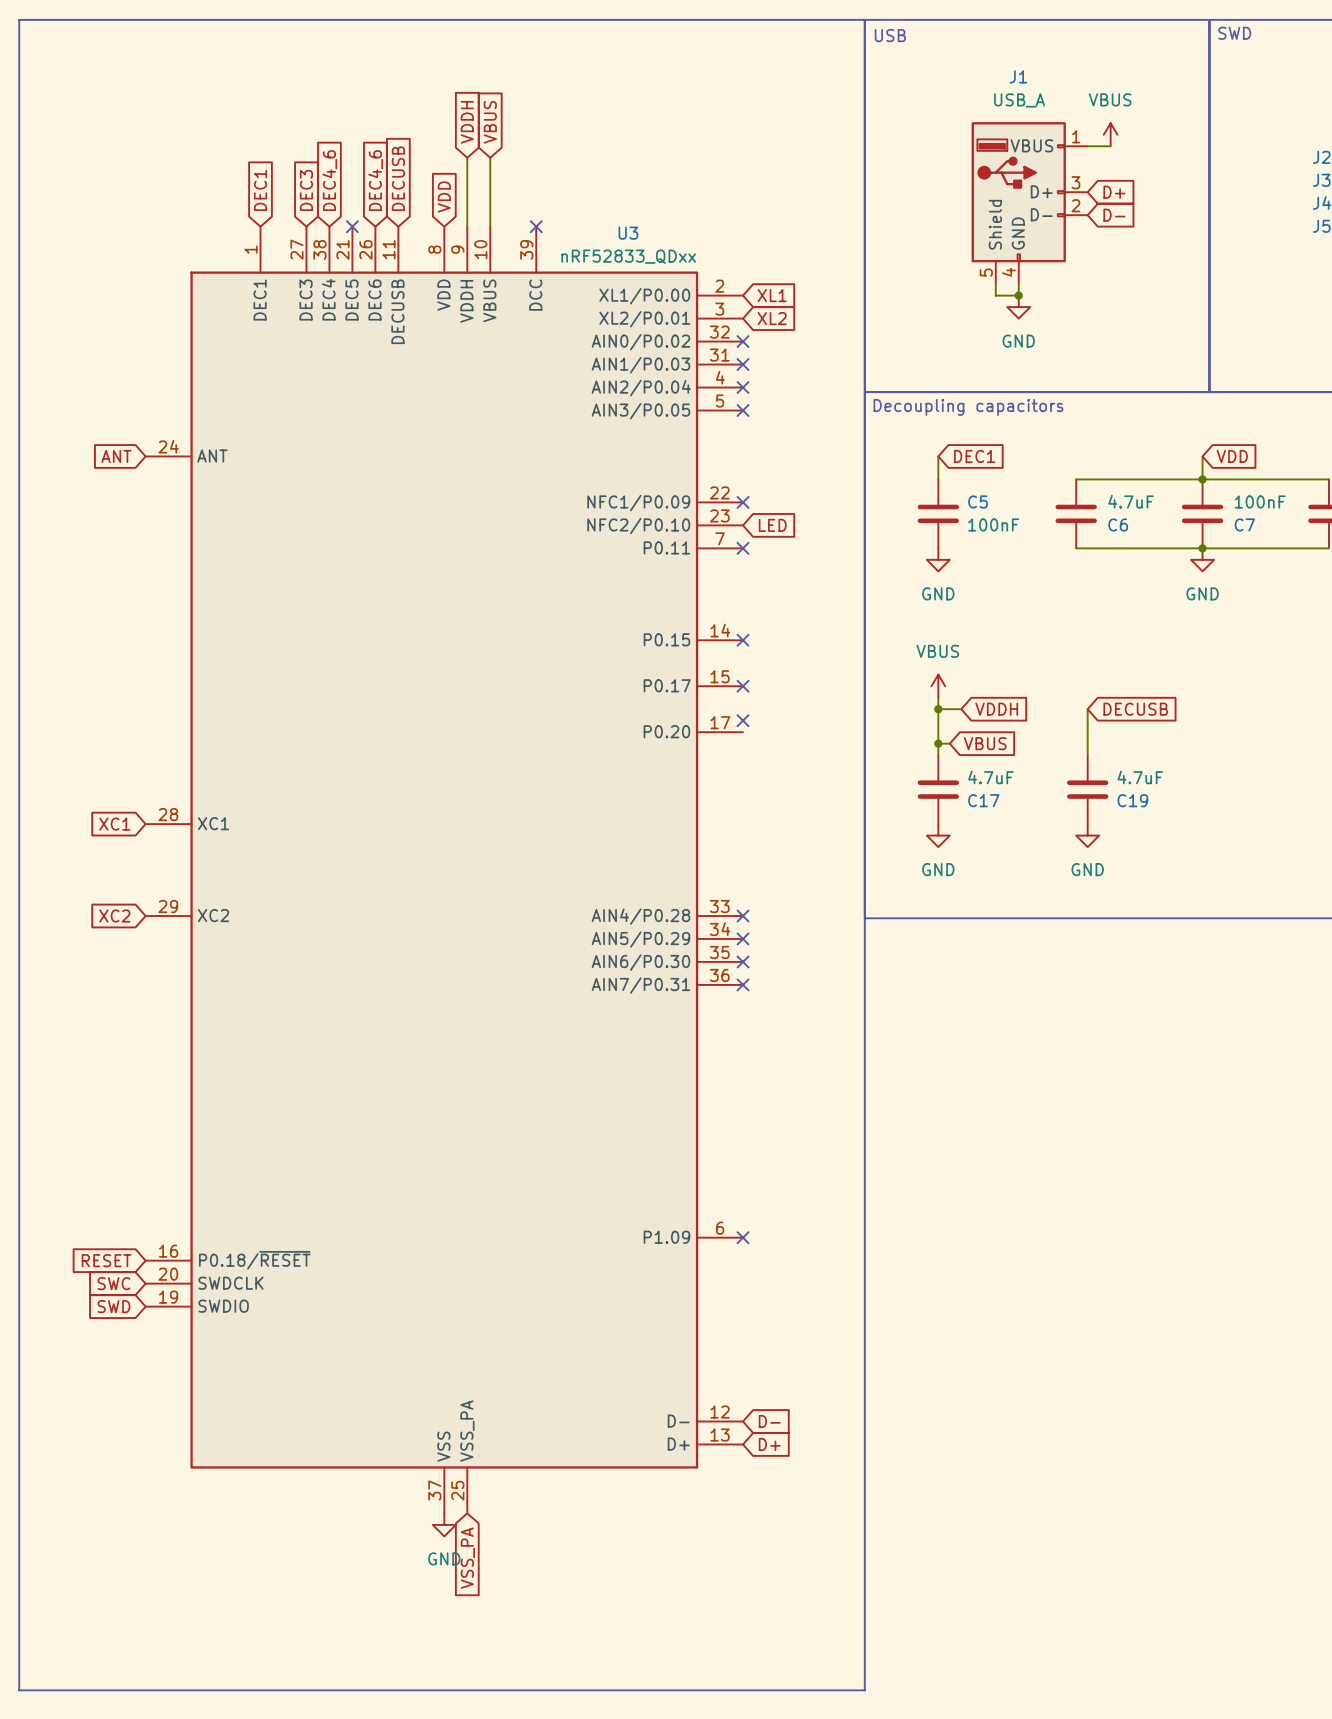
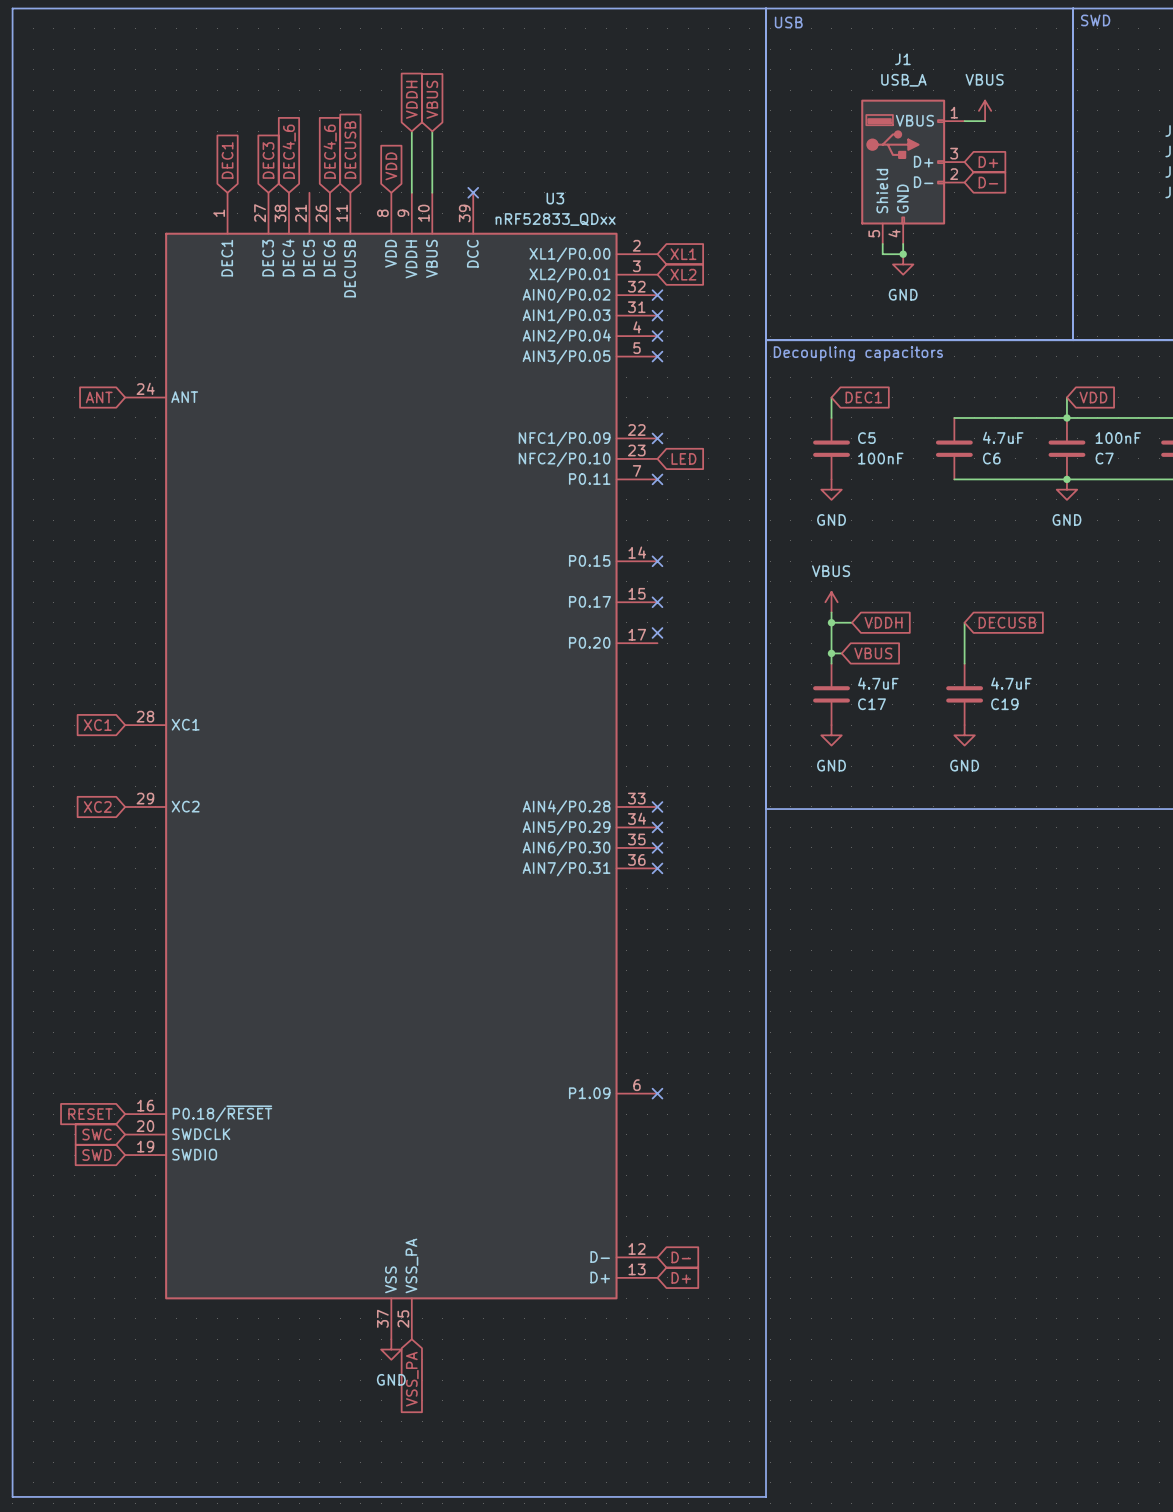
no-connect mark: (352, 226) -> none

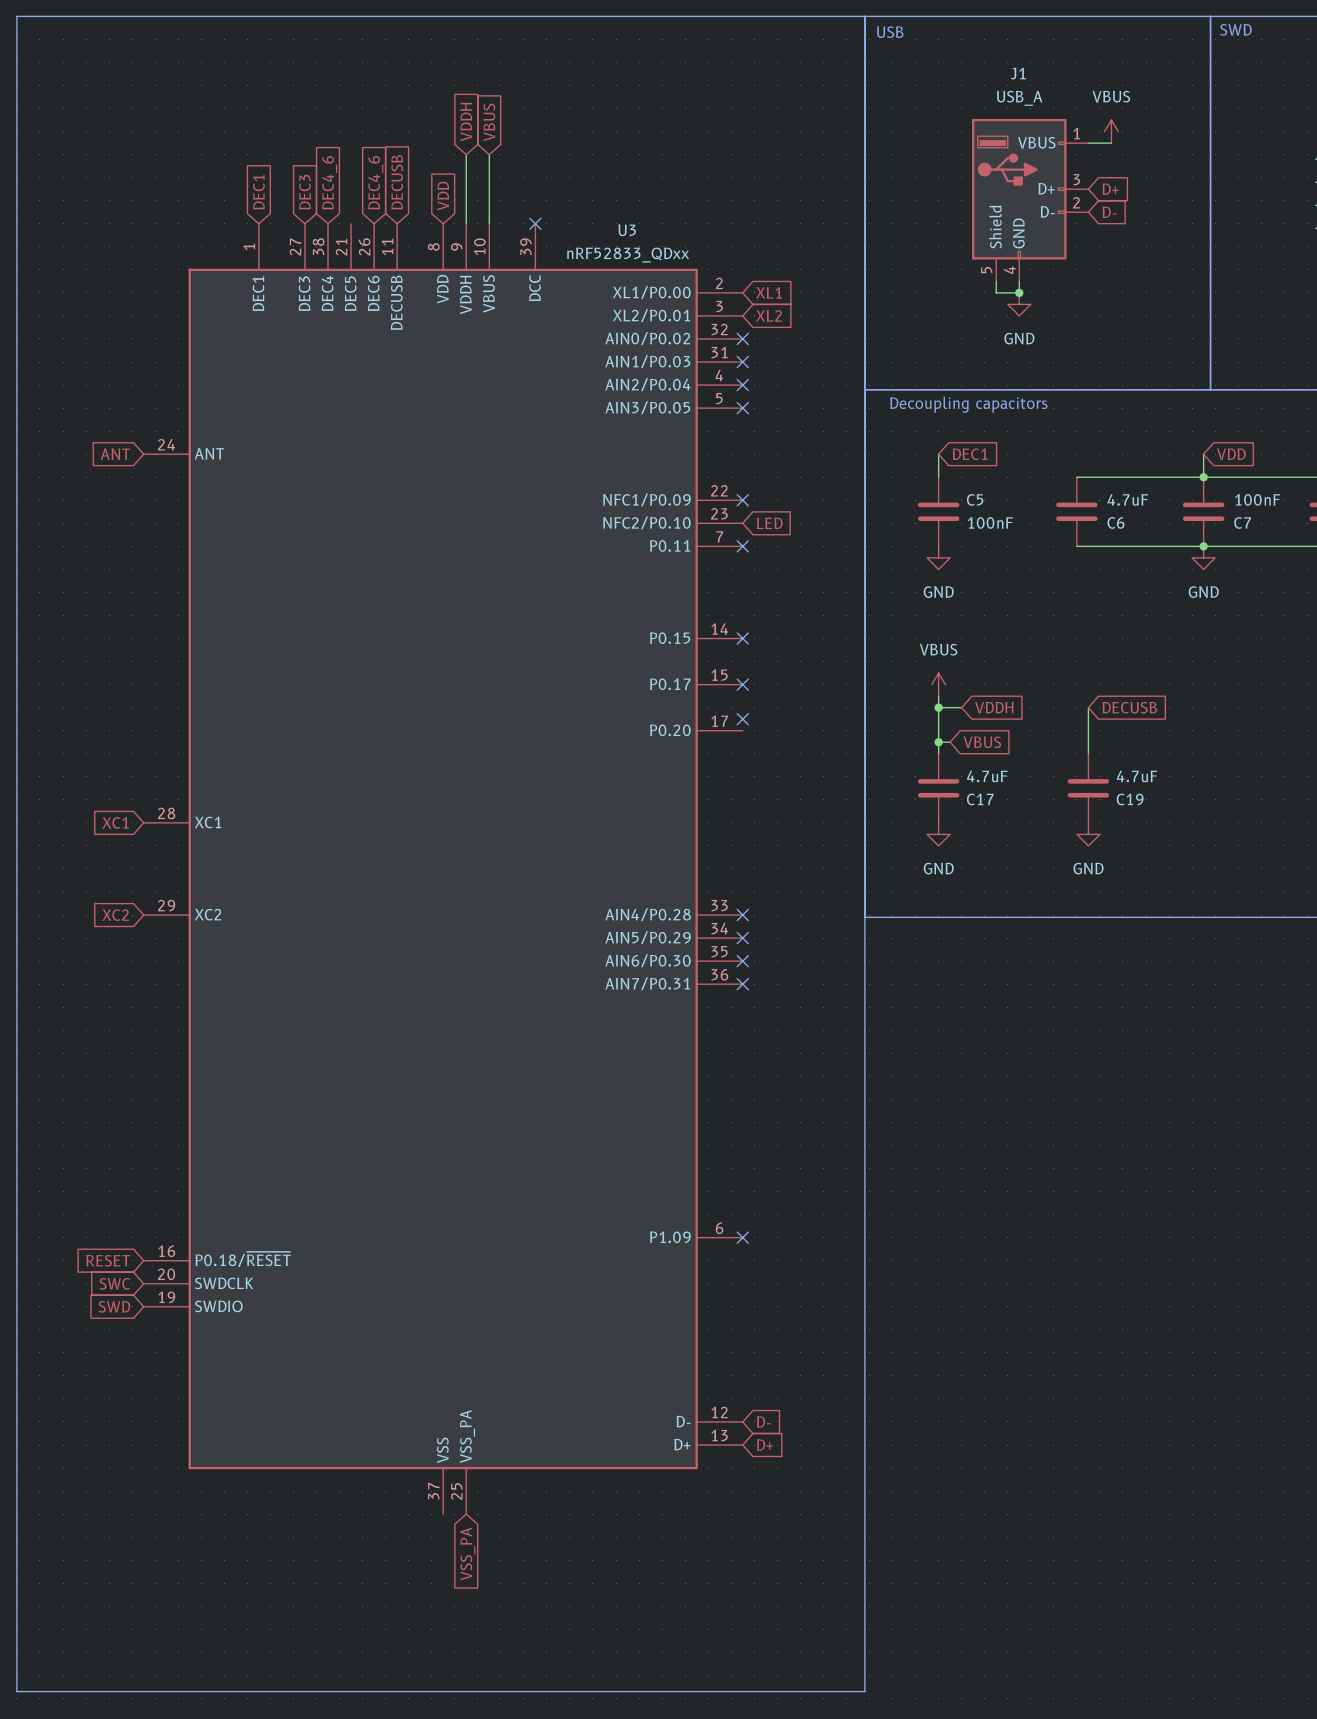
power symbol: GND (391, 1349) -> none

